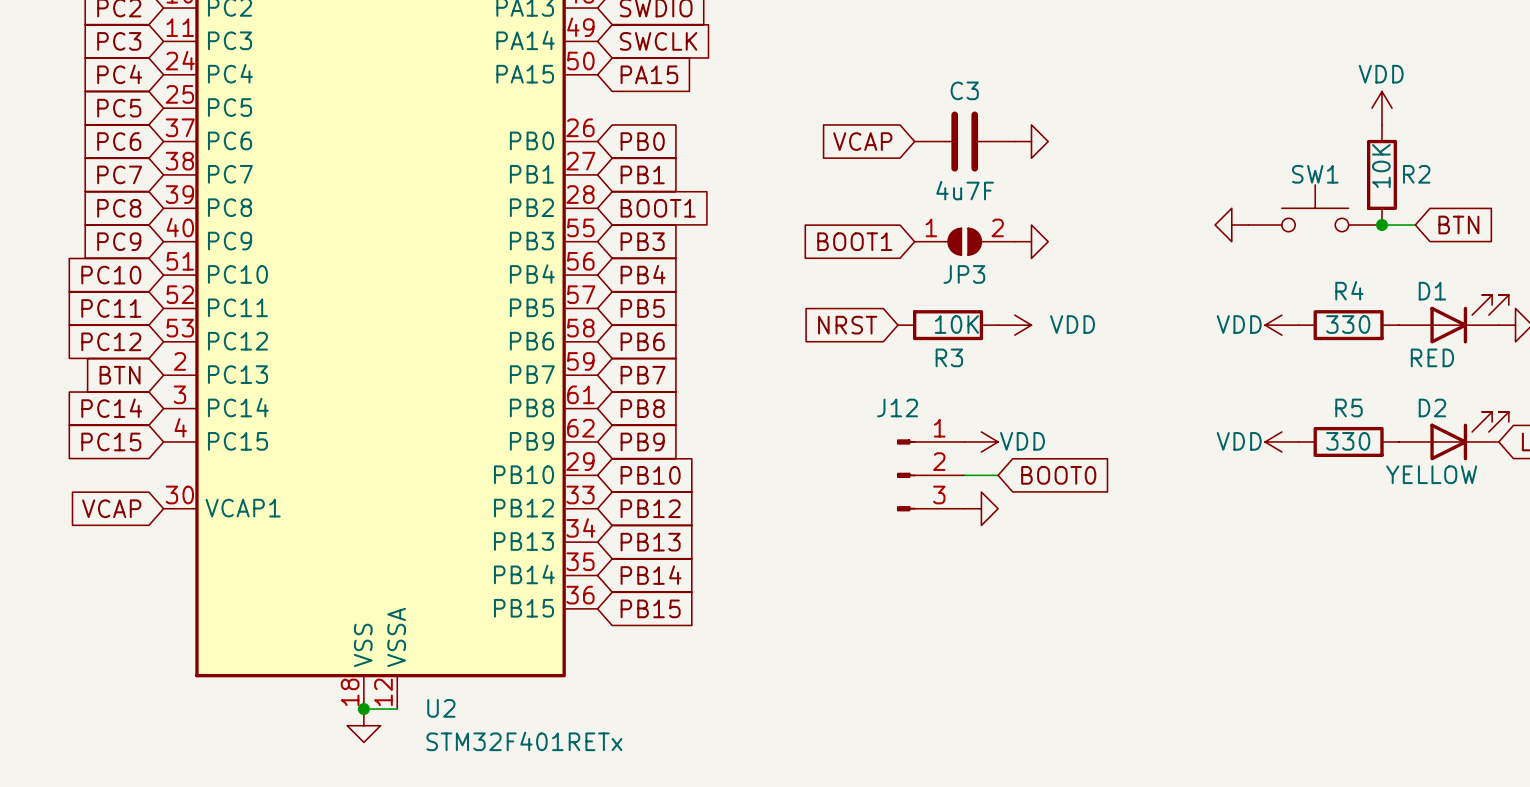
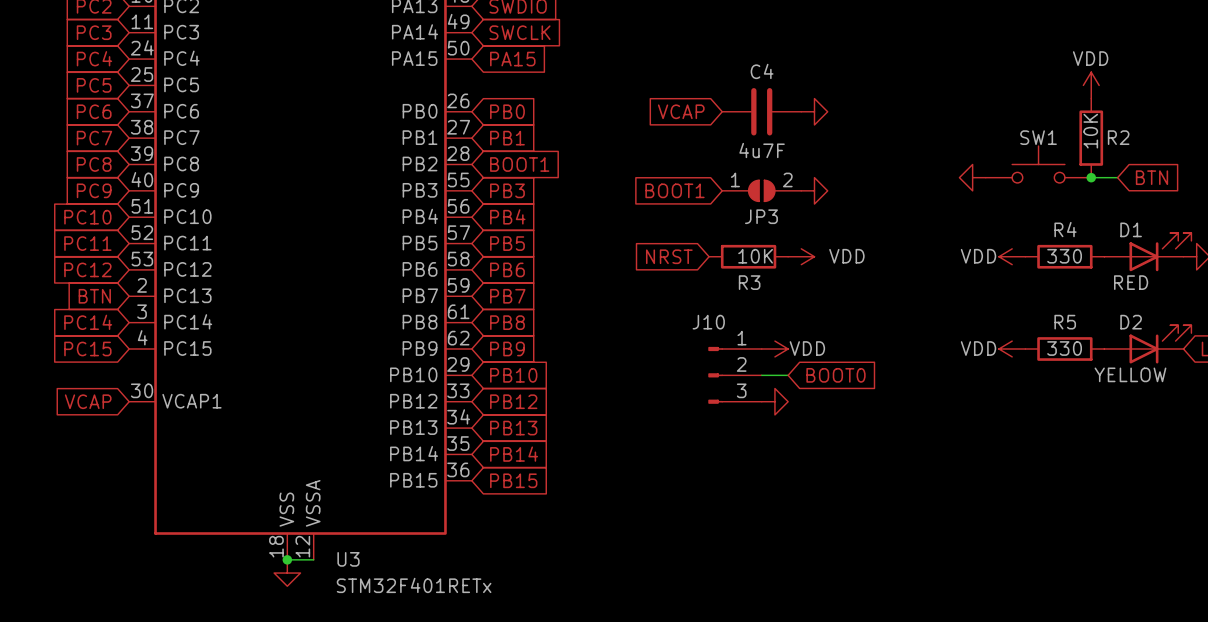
C3 name: C3 (964, 90) -> C4 (762, 71)
J12 name: J12 (897, 407) -> J10 (708, 322)
U2 name: U2 (441, 708) -> U3 (348, 559)

